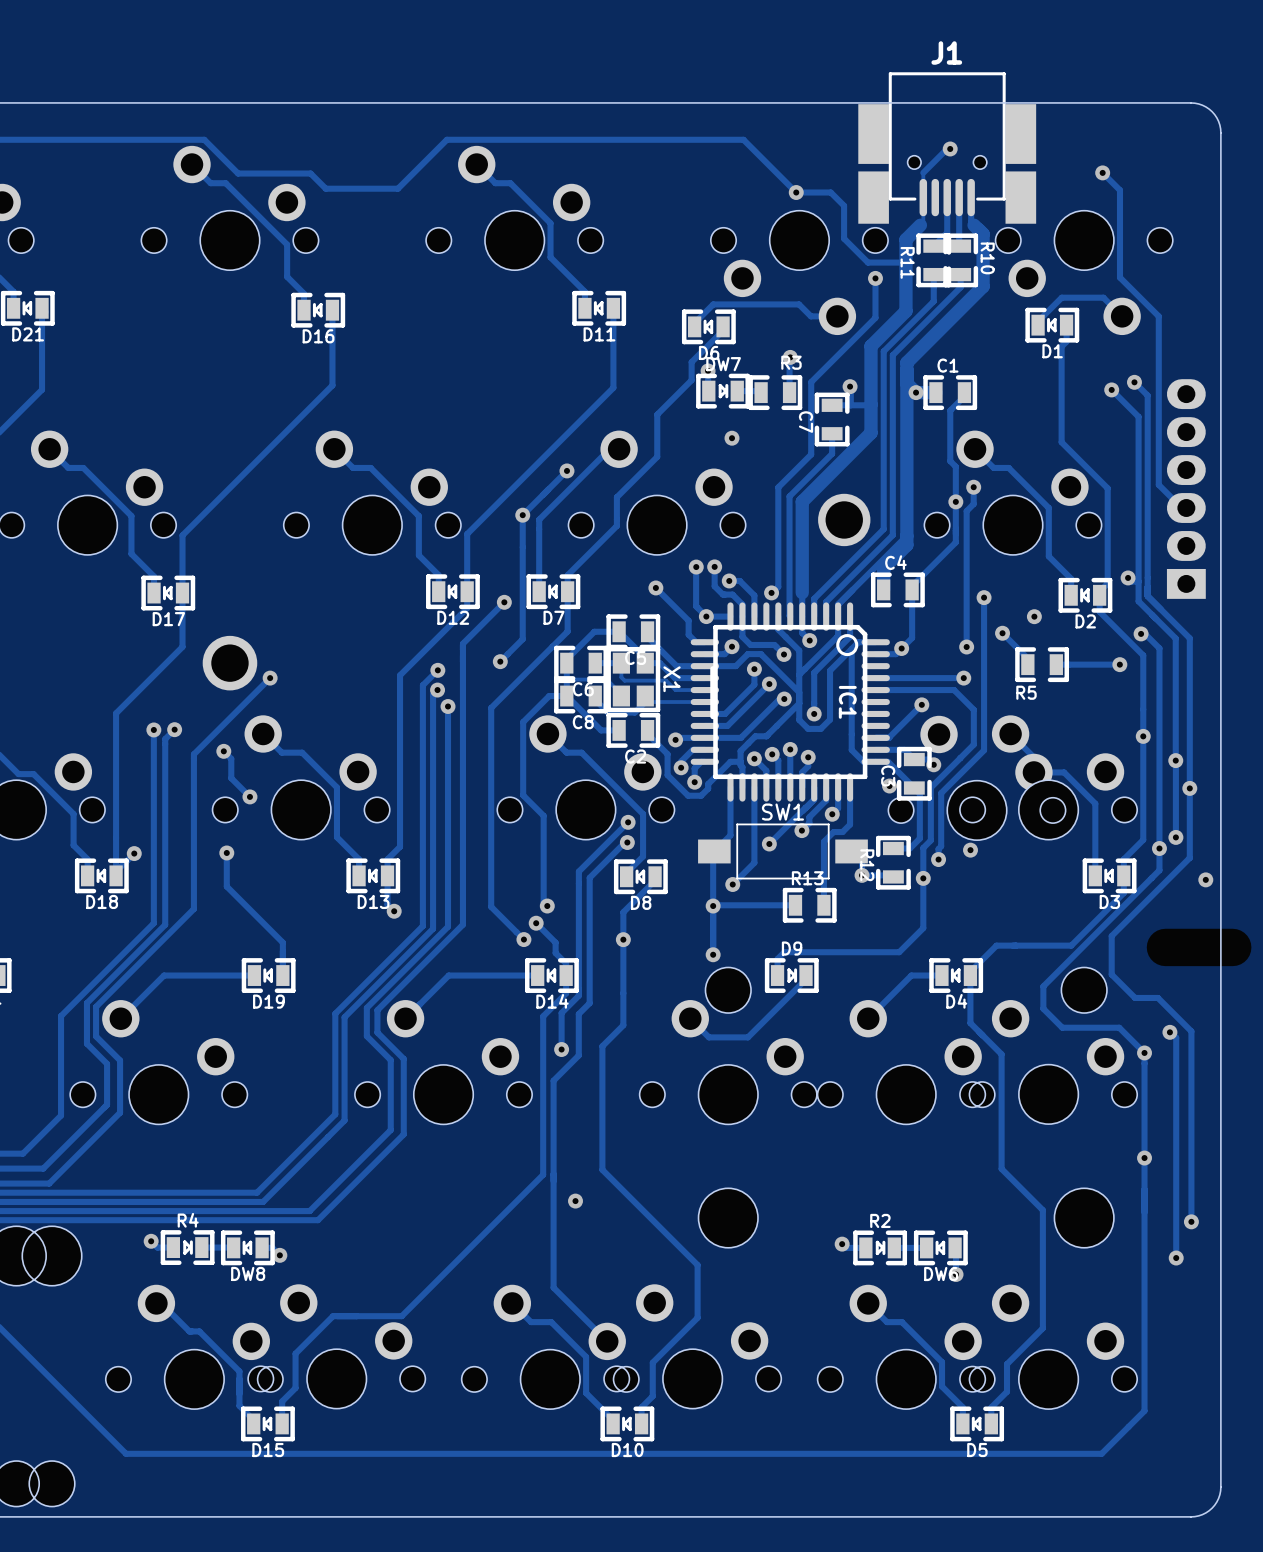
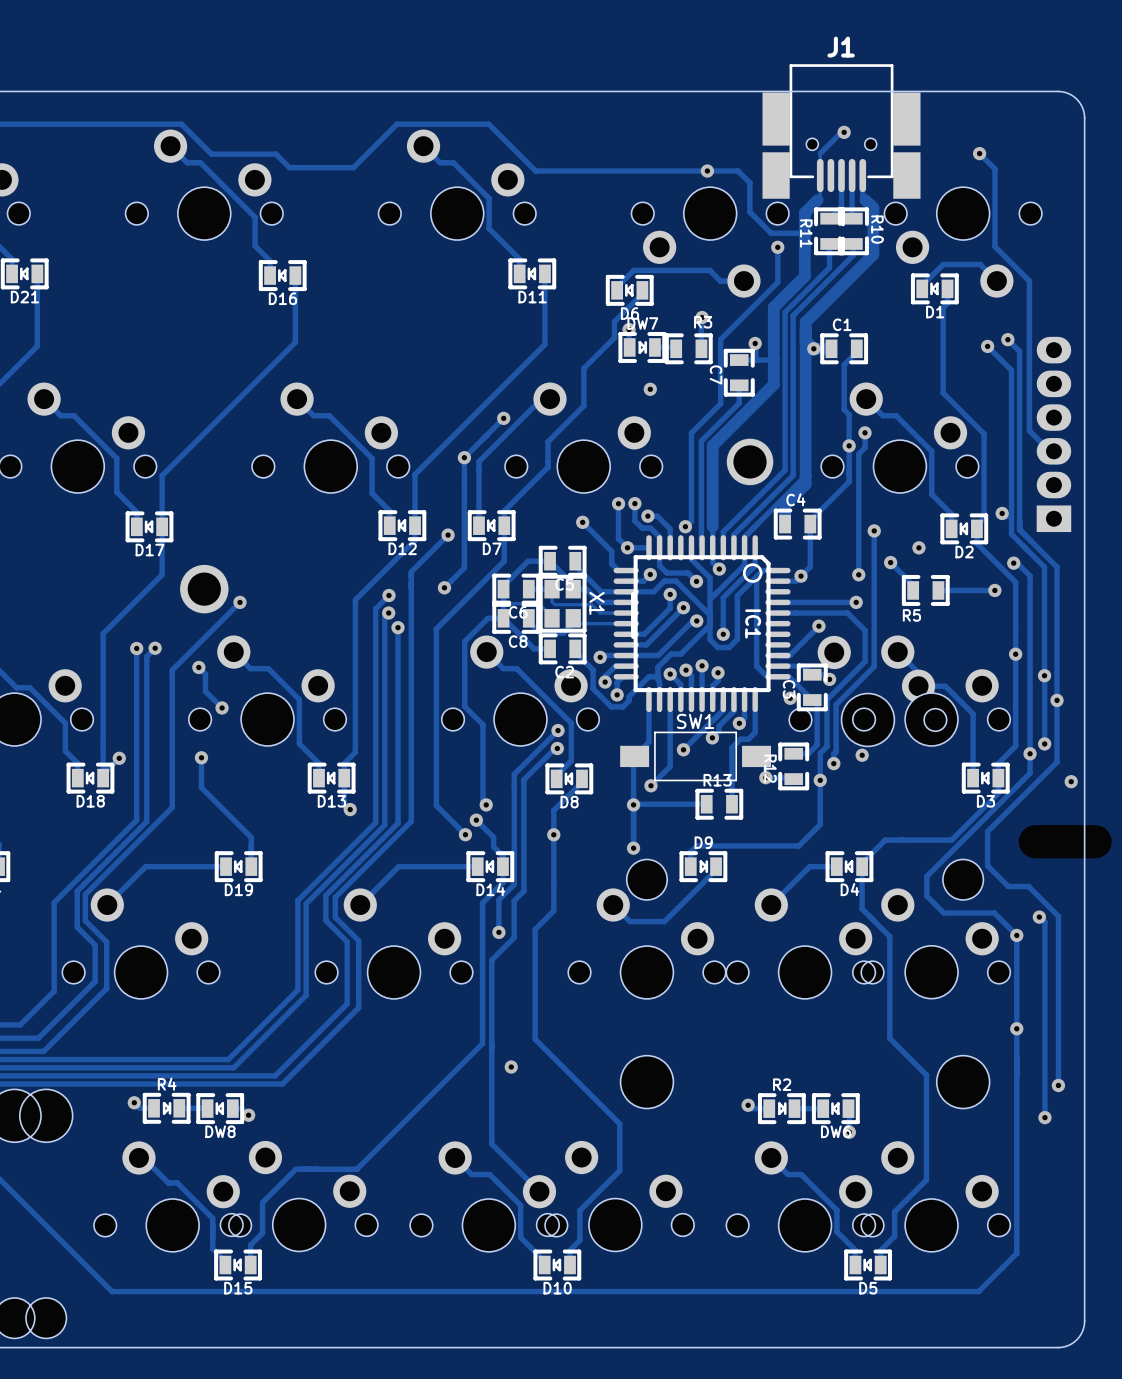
track: (550, 139) (743, 139) (796, 192) -> (488, 124) (535, 171) (707, 171)

